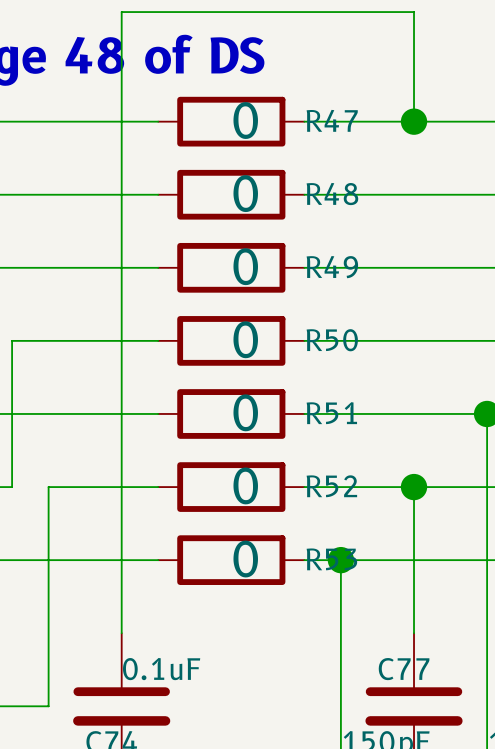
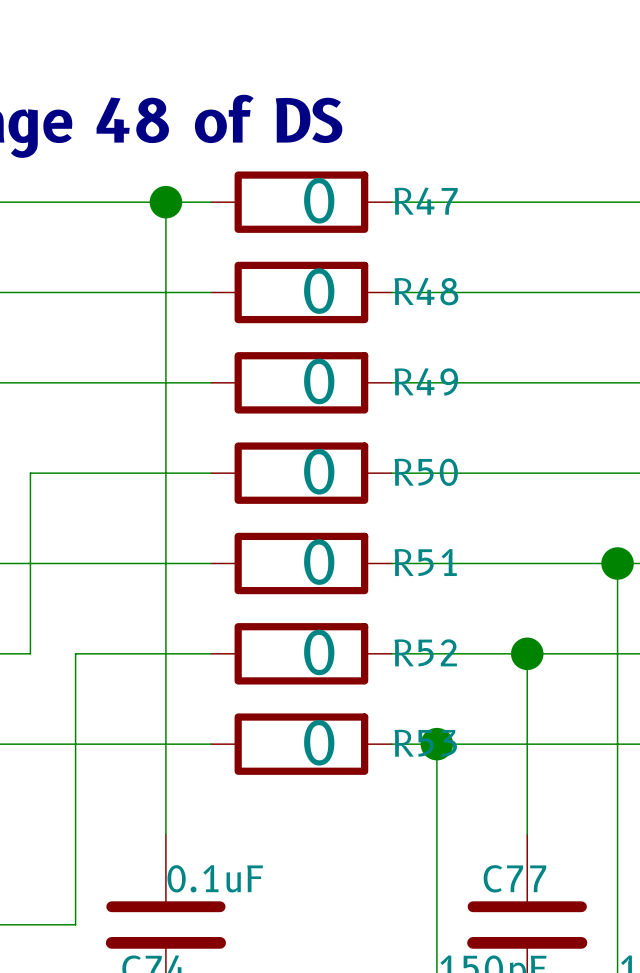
wire: (121, 121) (121, 12) (414, 12) (414, 121) -> none
junction: none -> (165, 202)
junction: (414, 121) -> none

